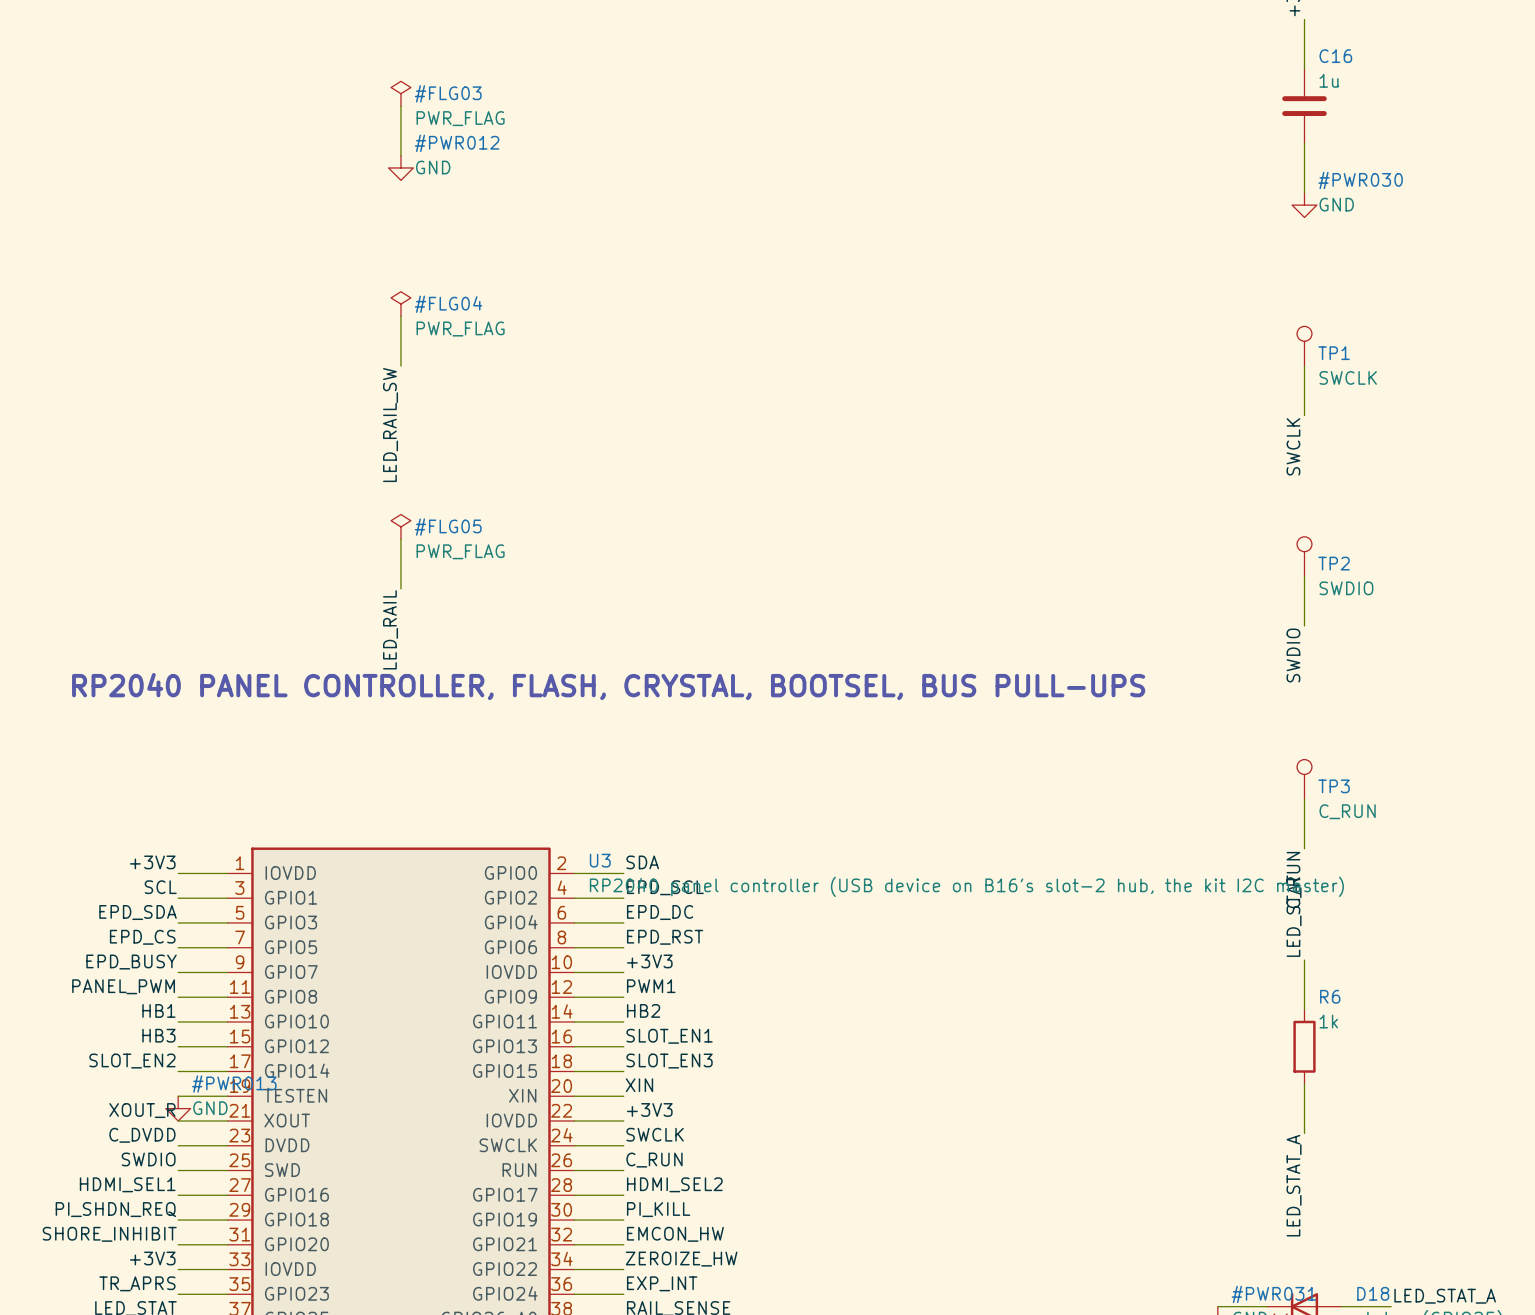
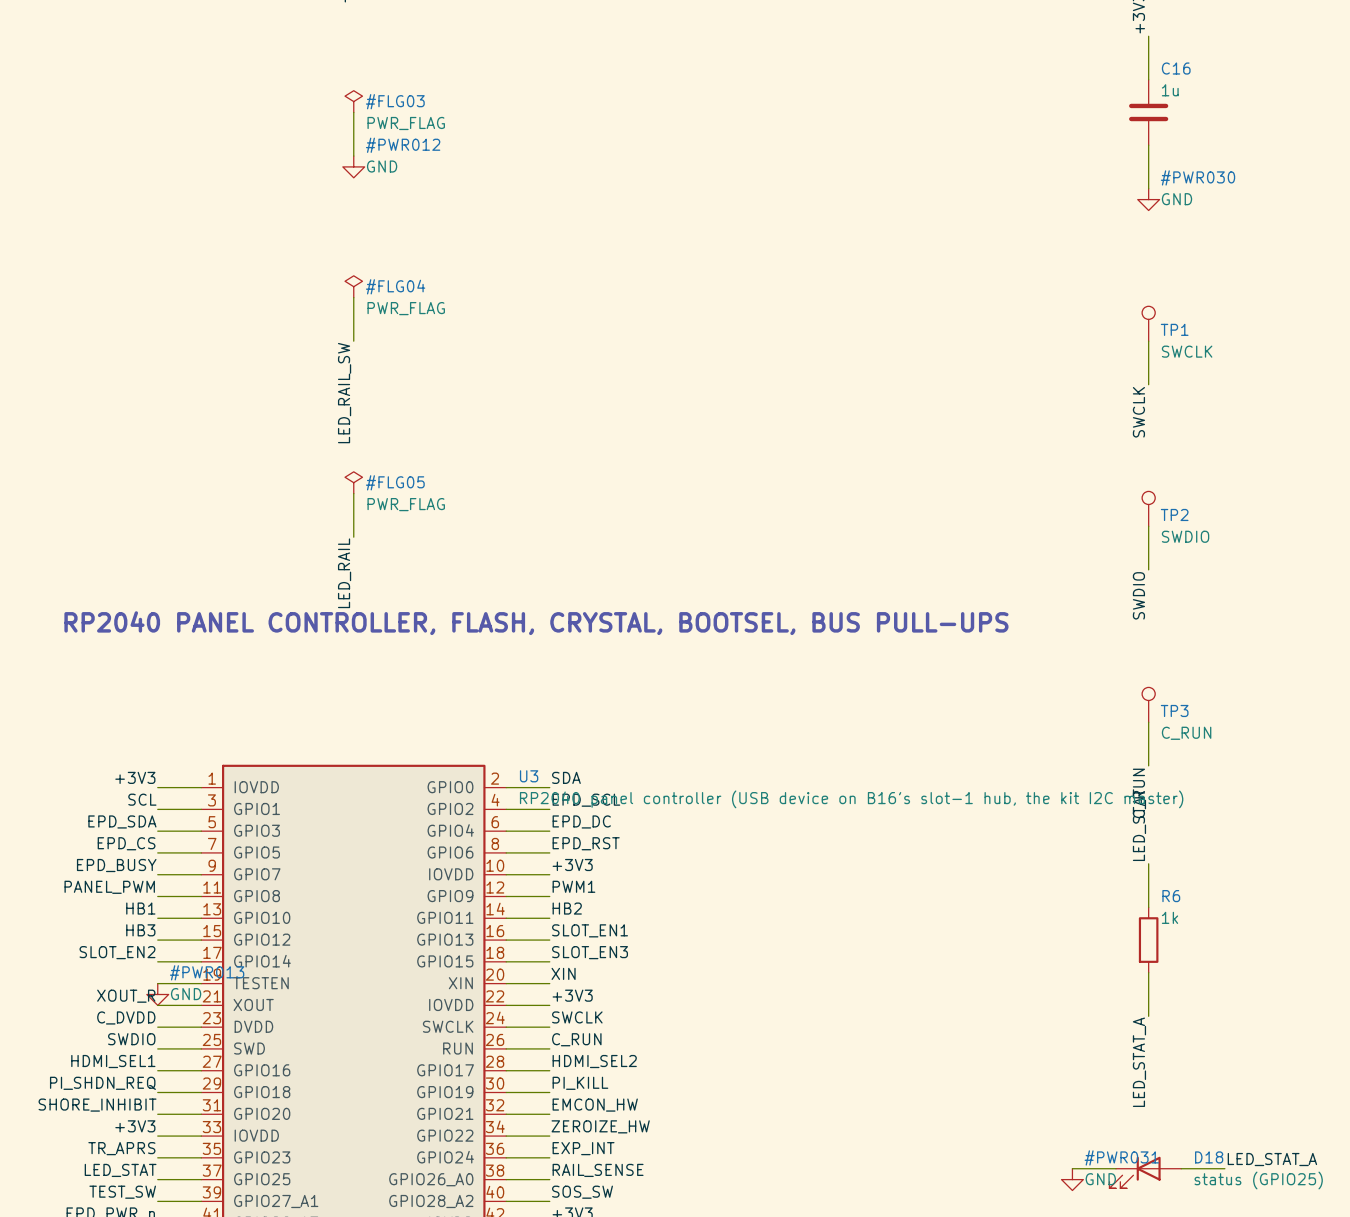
U3 value: RP2040 panel controller (USB device on B16's slot-2 hub, the kit I2C master) (966, 886) -> RP2040 panel controller (USB device on B16's slot-1 hub, the kit I2C master) (851, 799)

